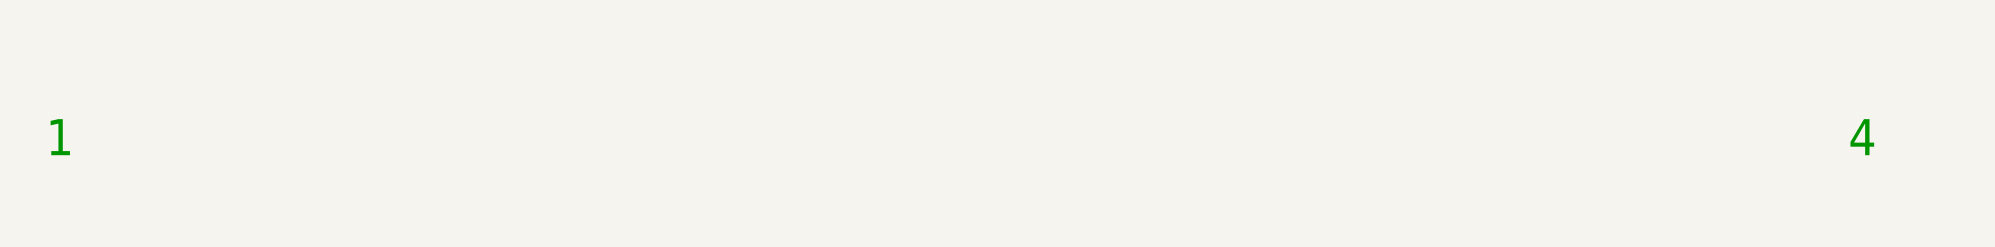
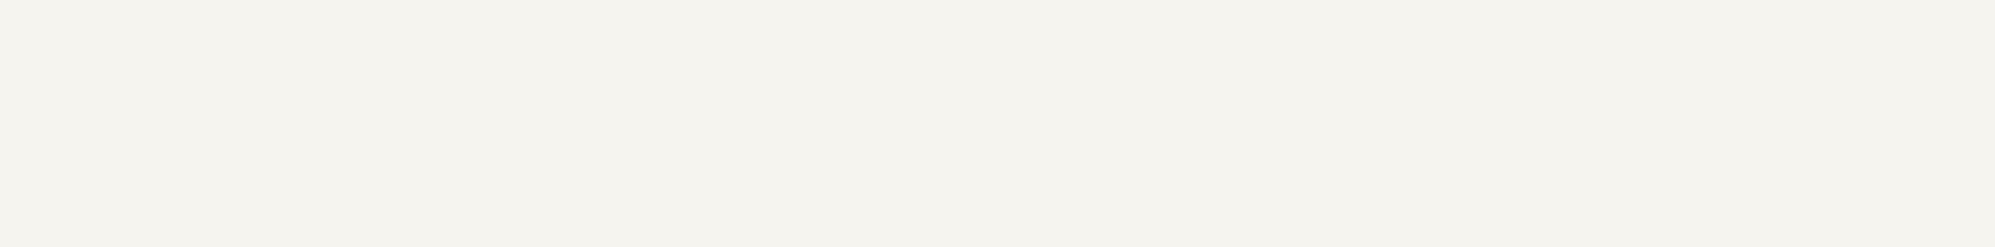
text: 1 (60, 137) -> none
text: 4 (1862, 137) -> none

